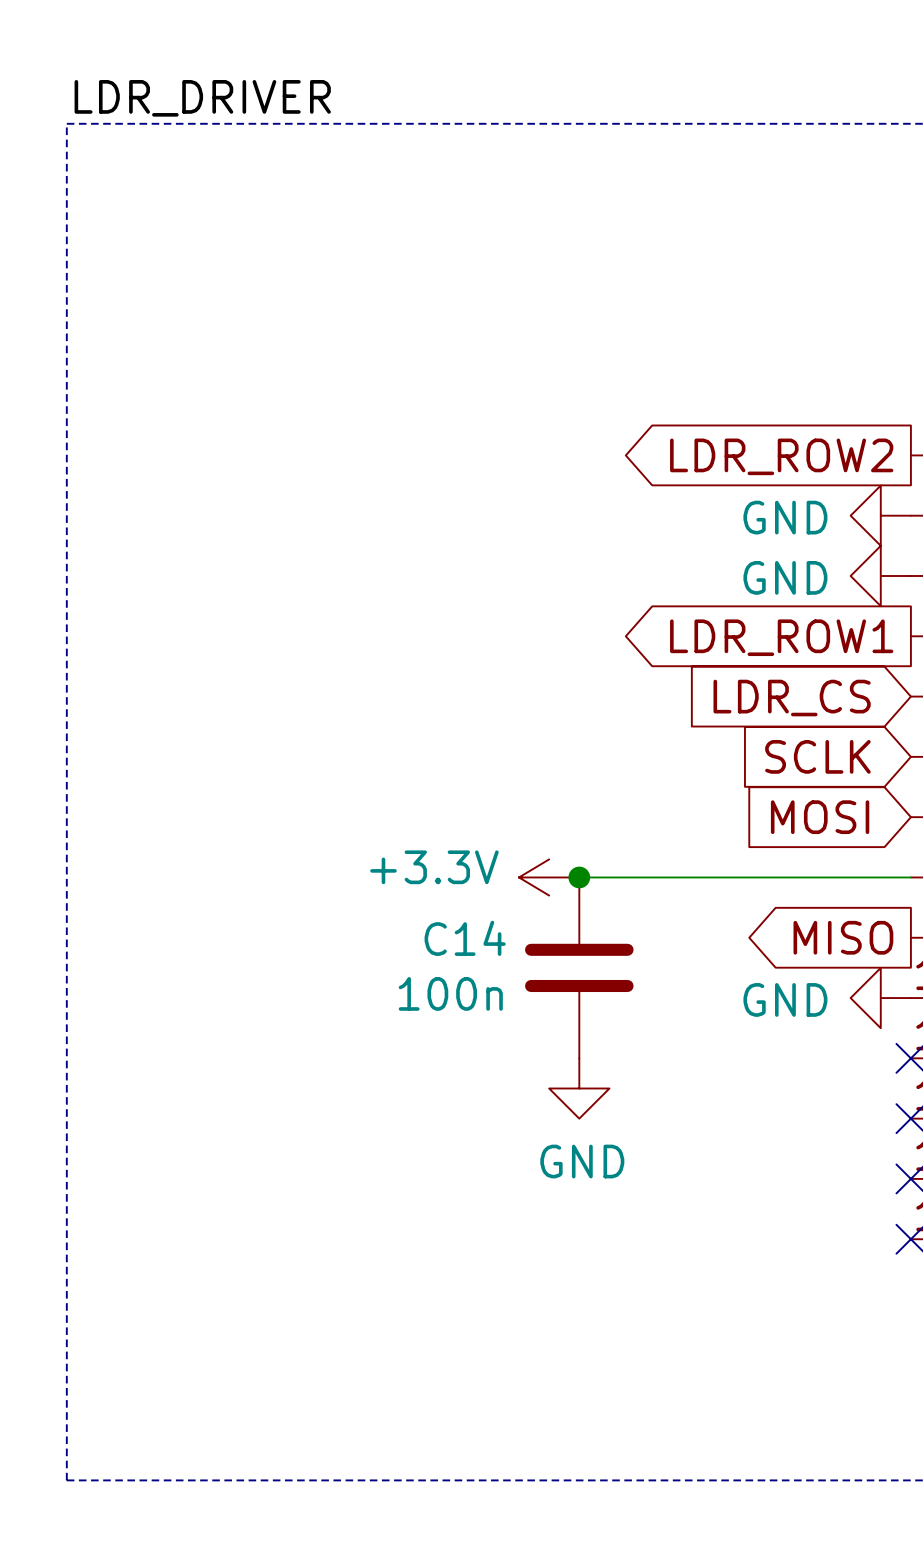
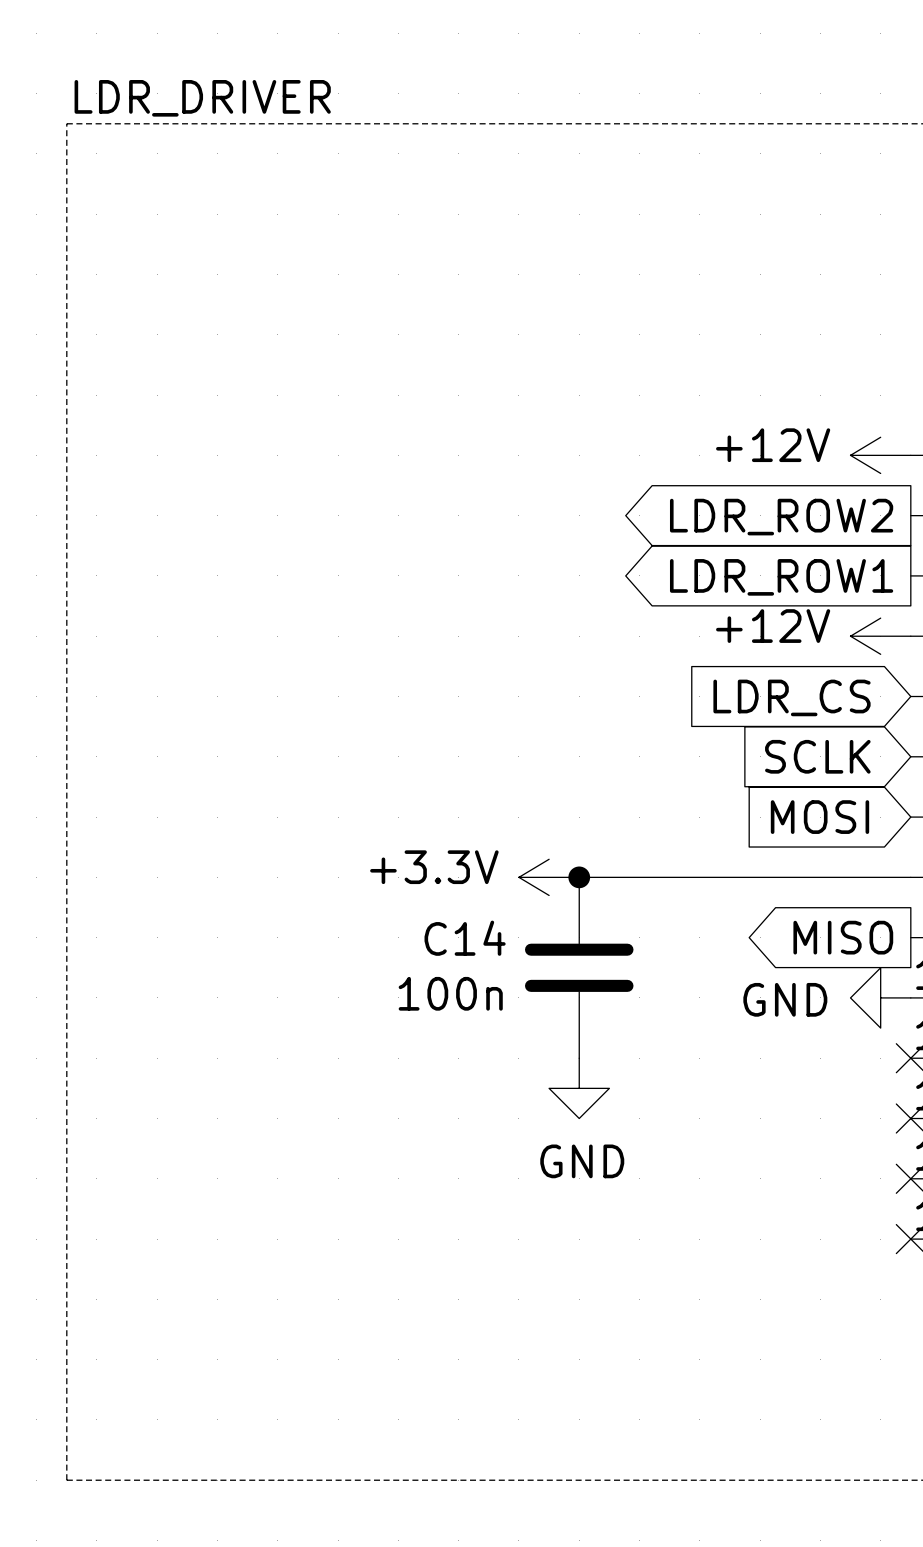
power symbol: none -> +12V (880, 455)
global label position: LDR_ROW2 (781, 456) -> LDR_ROW2 (781, 517)
power symbol: GND (880, 515) -> none
power symbol: GND (880, 576) -> none
power symbol: none -> +12V (880, 636)
global label position: LDR_ROW1 (781, 637) -> LDR_ROW1 (781, 577)

